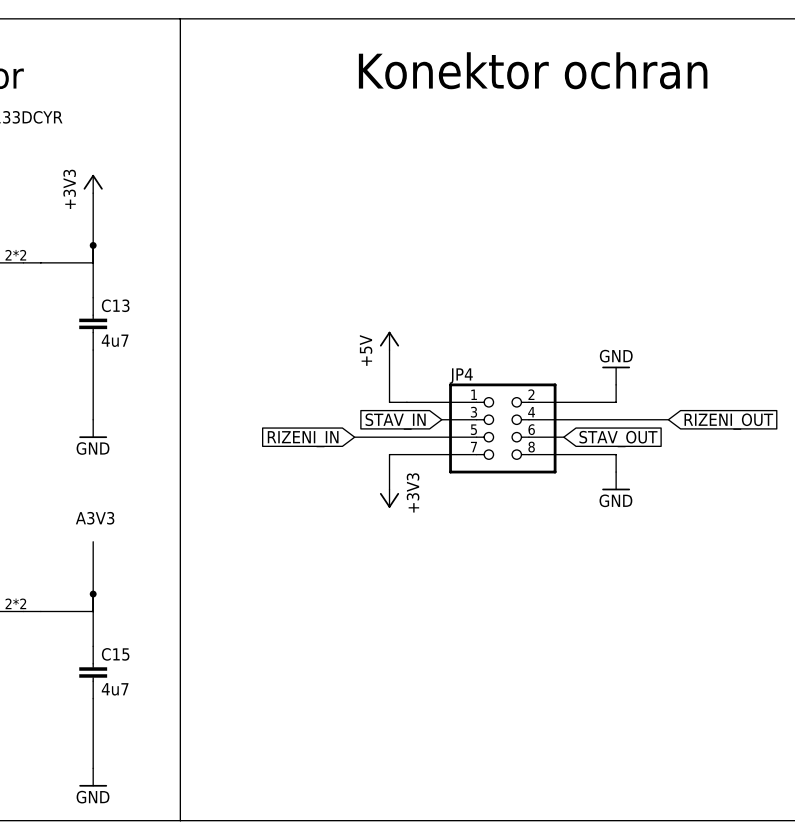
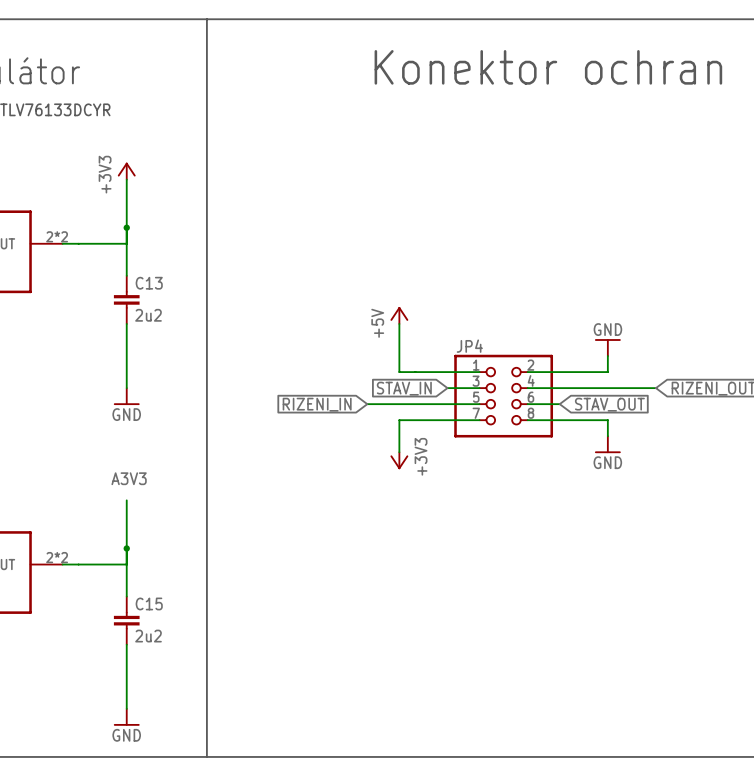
C13 value: 4u7 (115, 340) -> 2u2 (148, 315)
C15 value: 4u7 (115, 689) -> 2u2 (148, 636)

